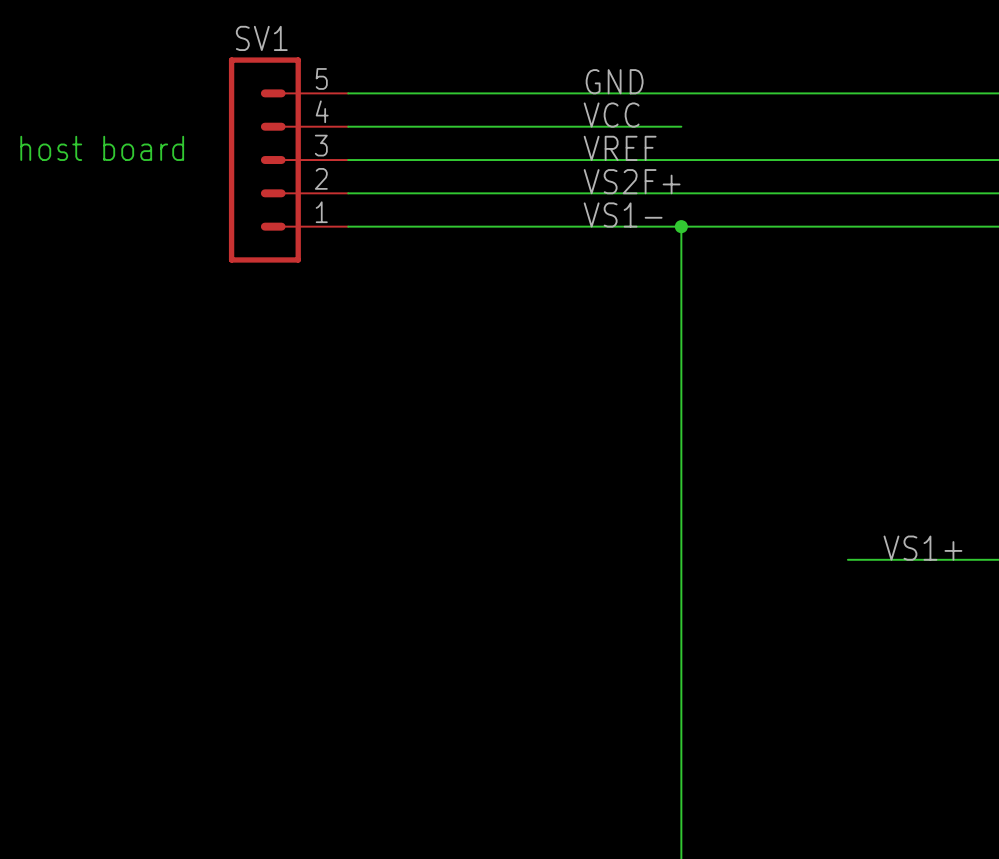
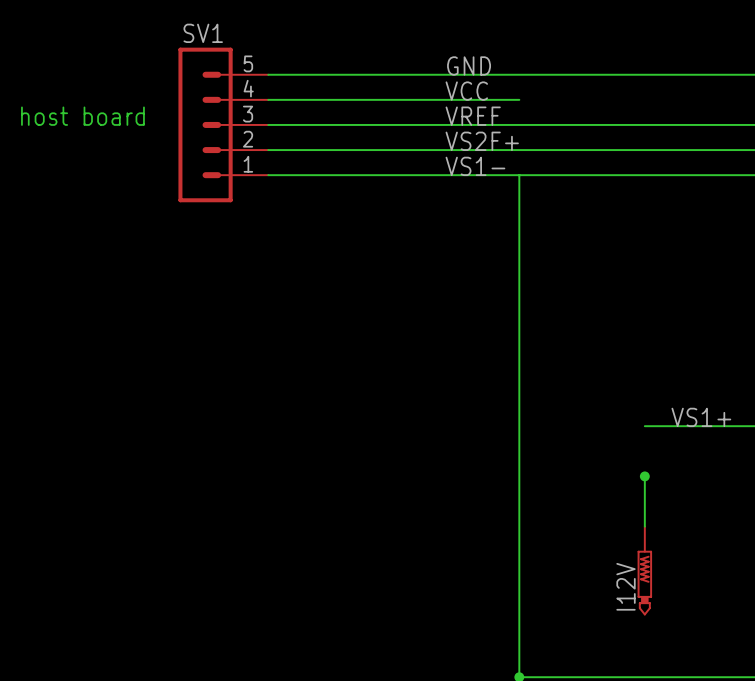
junction: (681, 226) -> none
wire: none -> (644, 476) (644, 526)
junction: none -> (644, 476)
I12V: none -> (644, 570)

